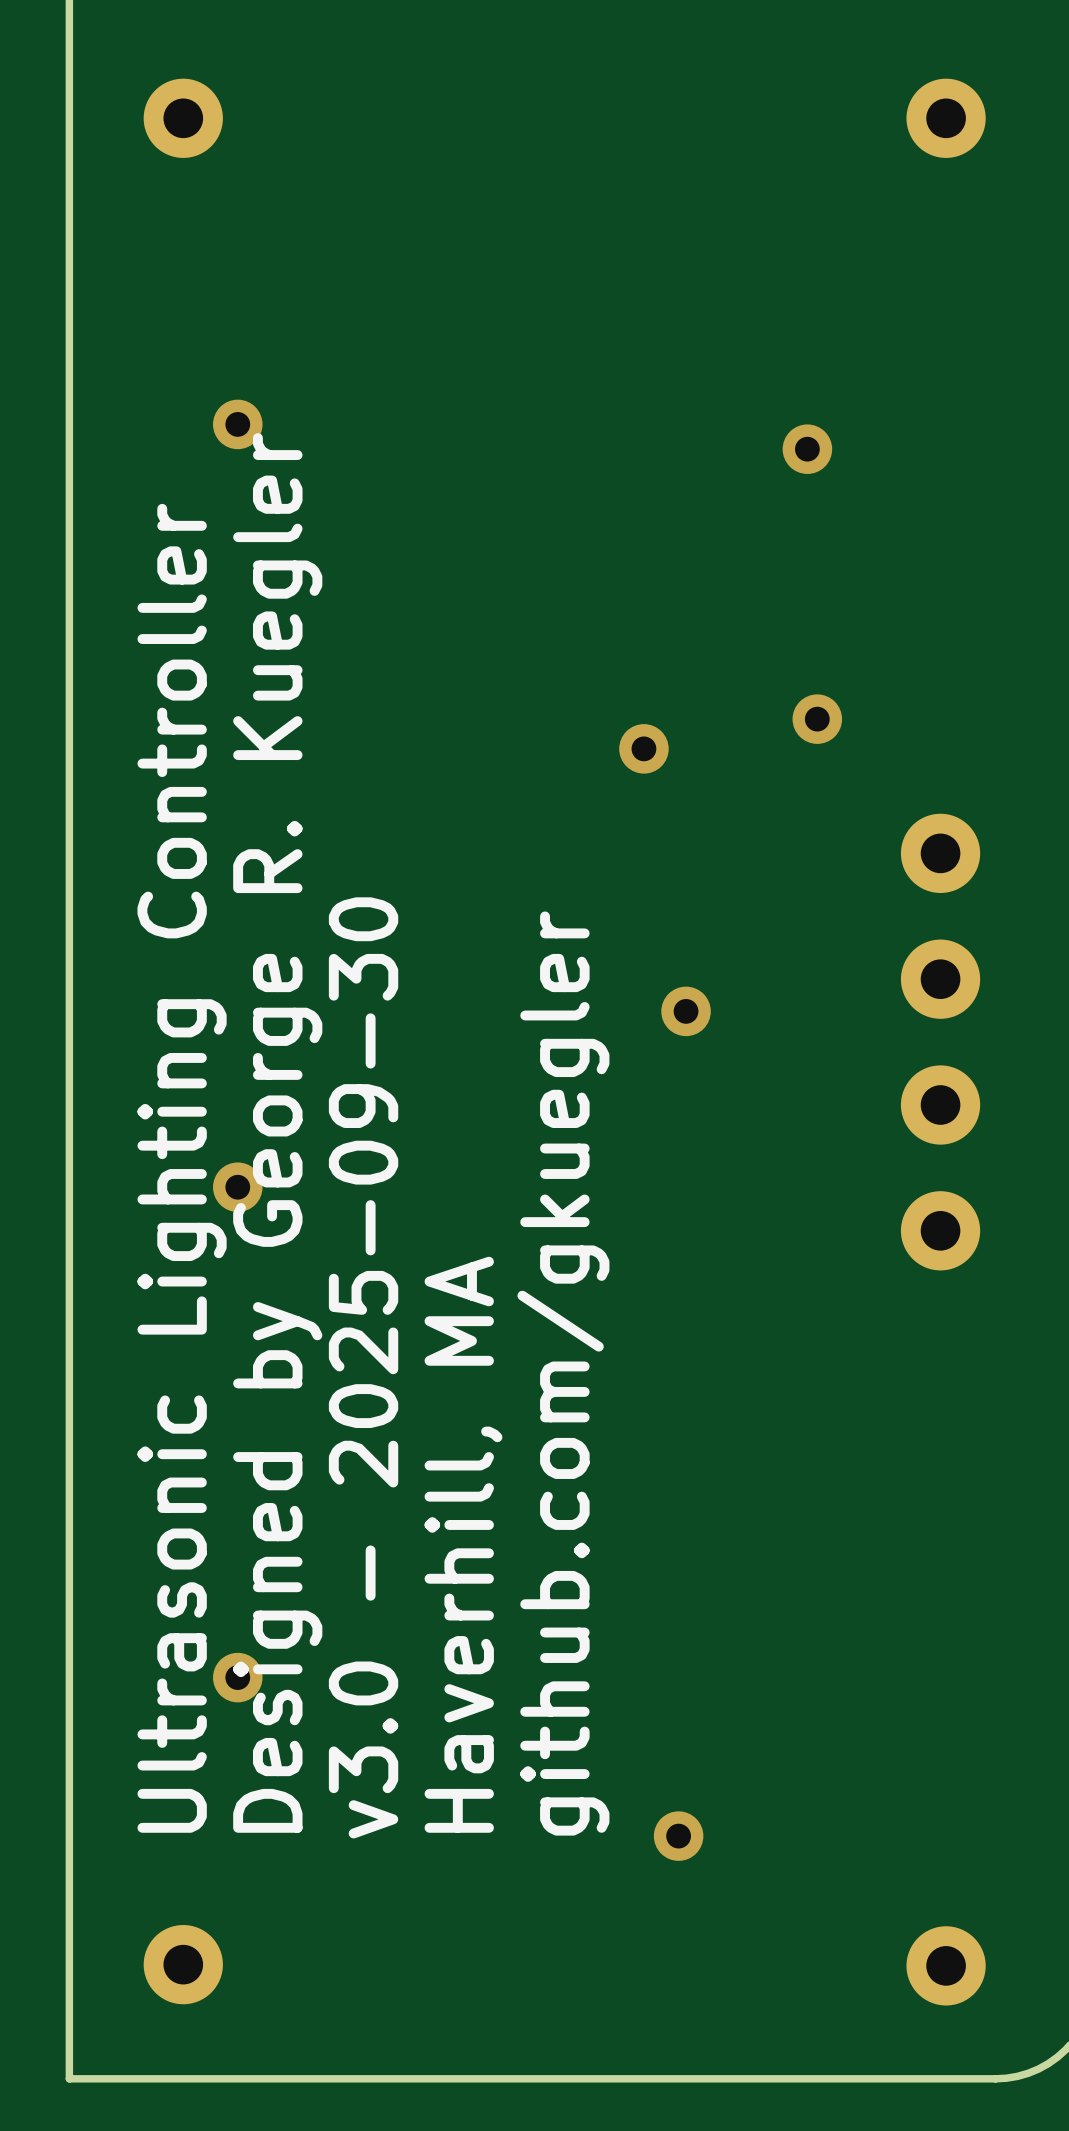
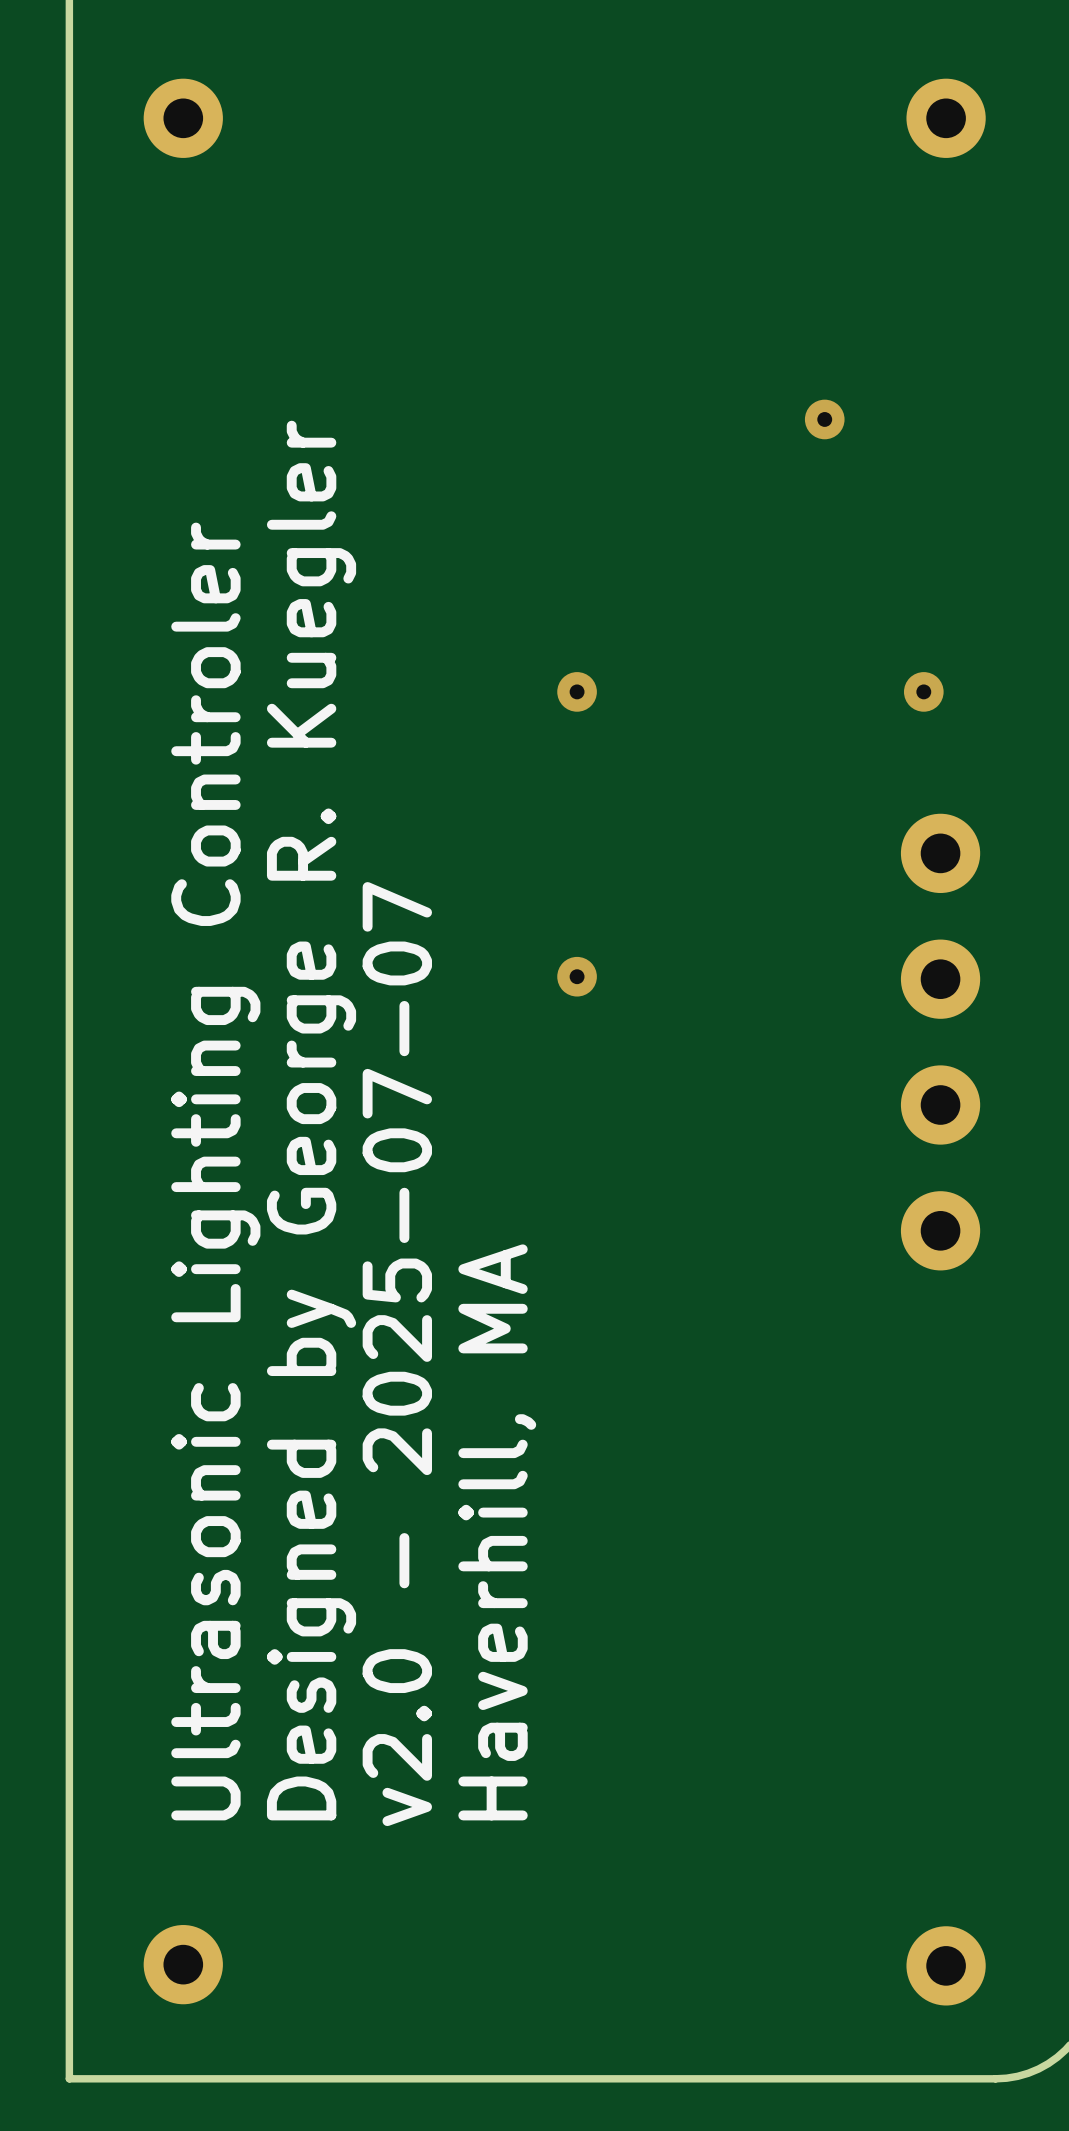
via: (237, 424) -> none
via position: (807, 449) -> (824, 419)
via: none -> (577, 691)
via: none -> (923, 691)
via: (817, 719) -> none
via: (643, 748) -> none
via: none -> (577, 976)
via: (686, 1011) -> none
text position: Designed by George R. Kuegler (277, 1132) -> Designed by George R. Kuegler (311, 1120)
text: Ultrasonic Lighting Controller (182, 1168) -> Ultrasonic Lighting Controler (215, 1171)
via: (237, 1187) -> none
text: v3.0 - 2025-09-30 (363, 1367) -> v2.0 - 2025-07-07 (397, 1354)
text: github.com/gkuegler (563, 1373) -> none
text position: Haverhill, MA (463, 1544) -> Haverhill, MA (497, 1532)
via: (237, 1677) -> none
via: (678, 1836) -> none

